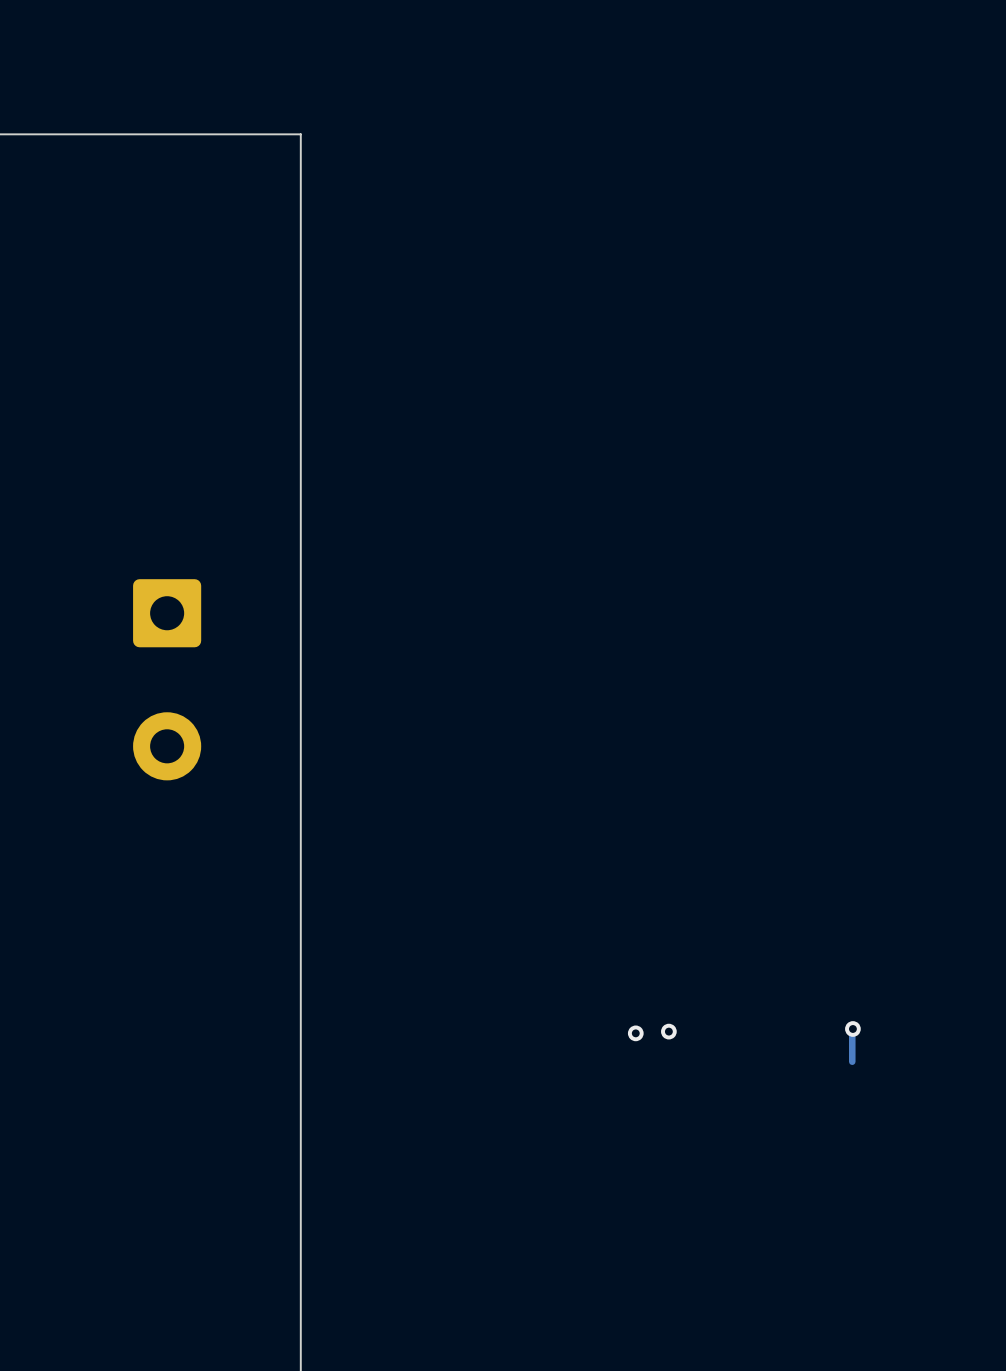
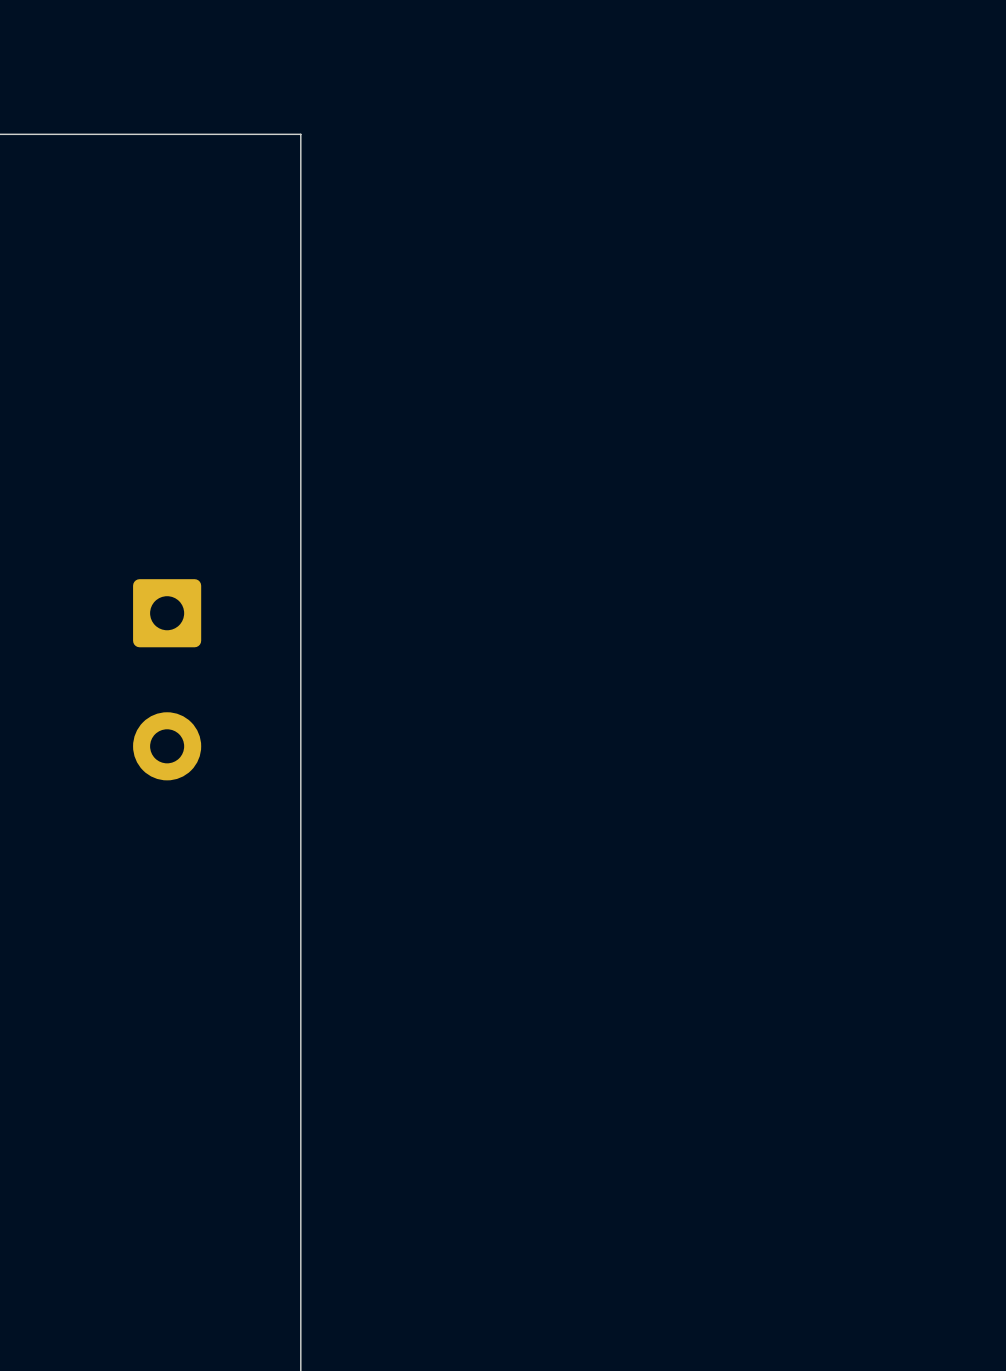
track: (852, 1028) (852, 1061) -> none
via: (852, 1028) -> none
via: (668, 1031) -> none
via: (635, 1033) -> none

